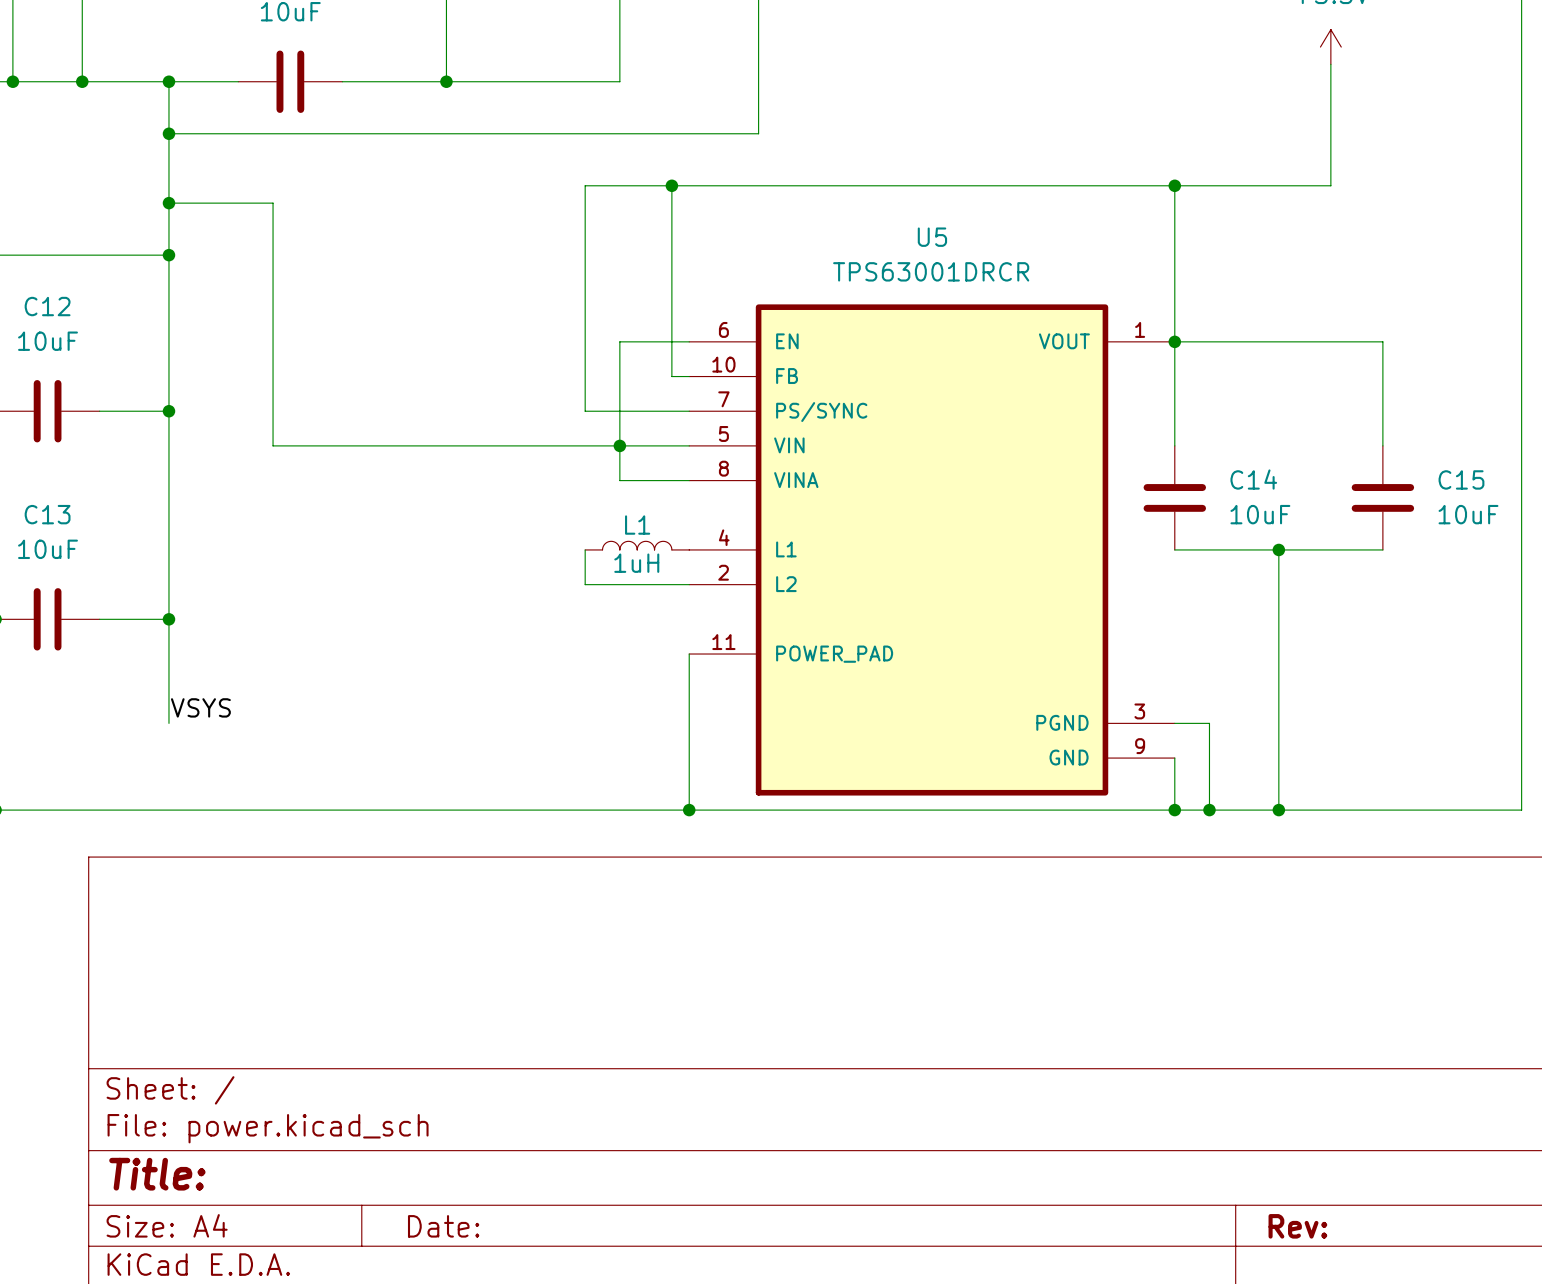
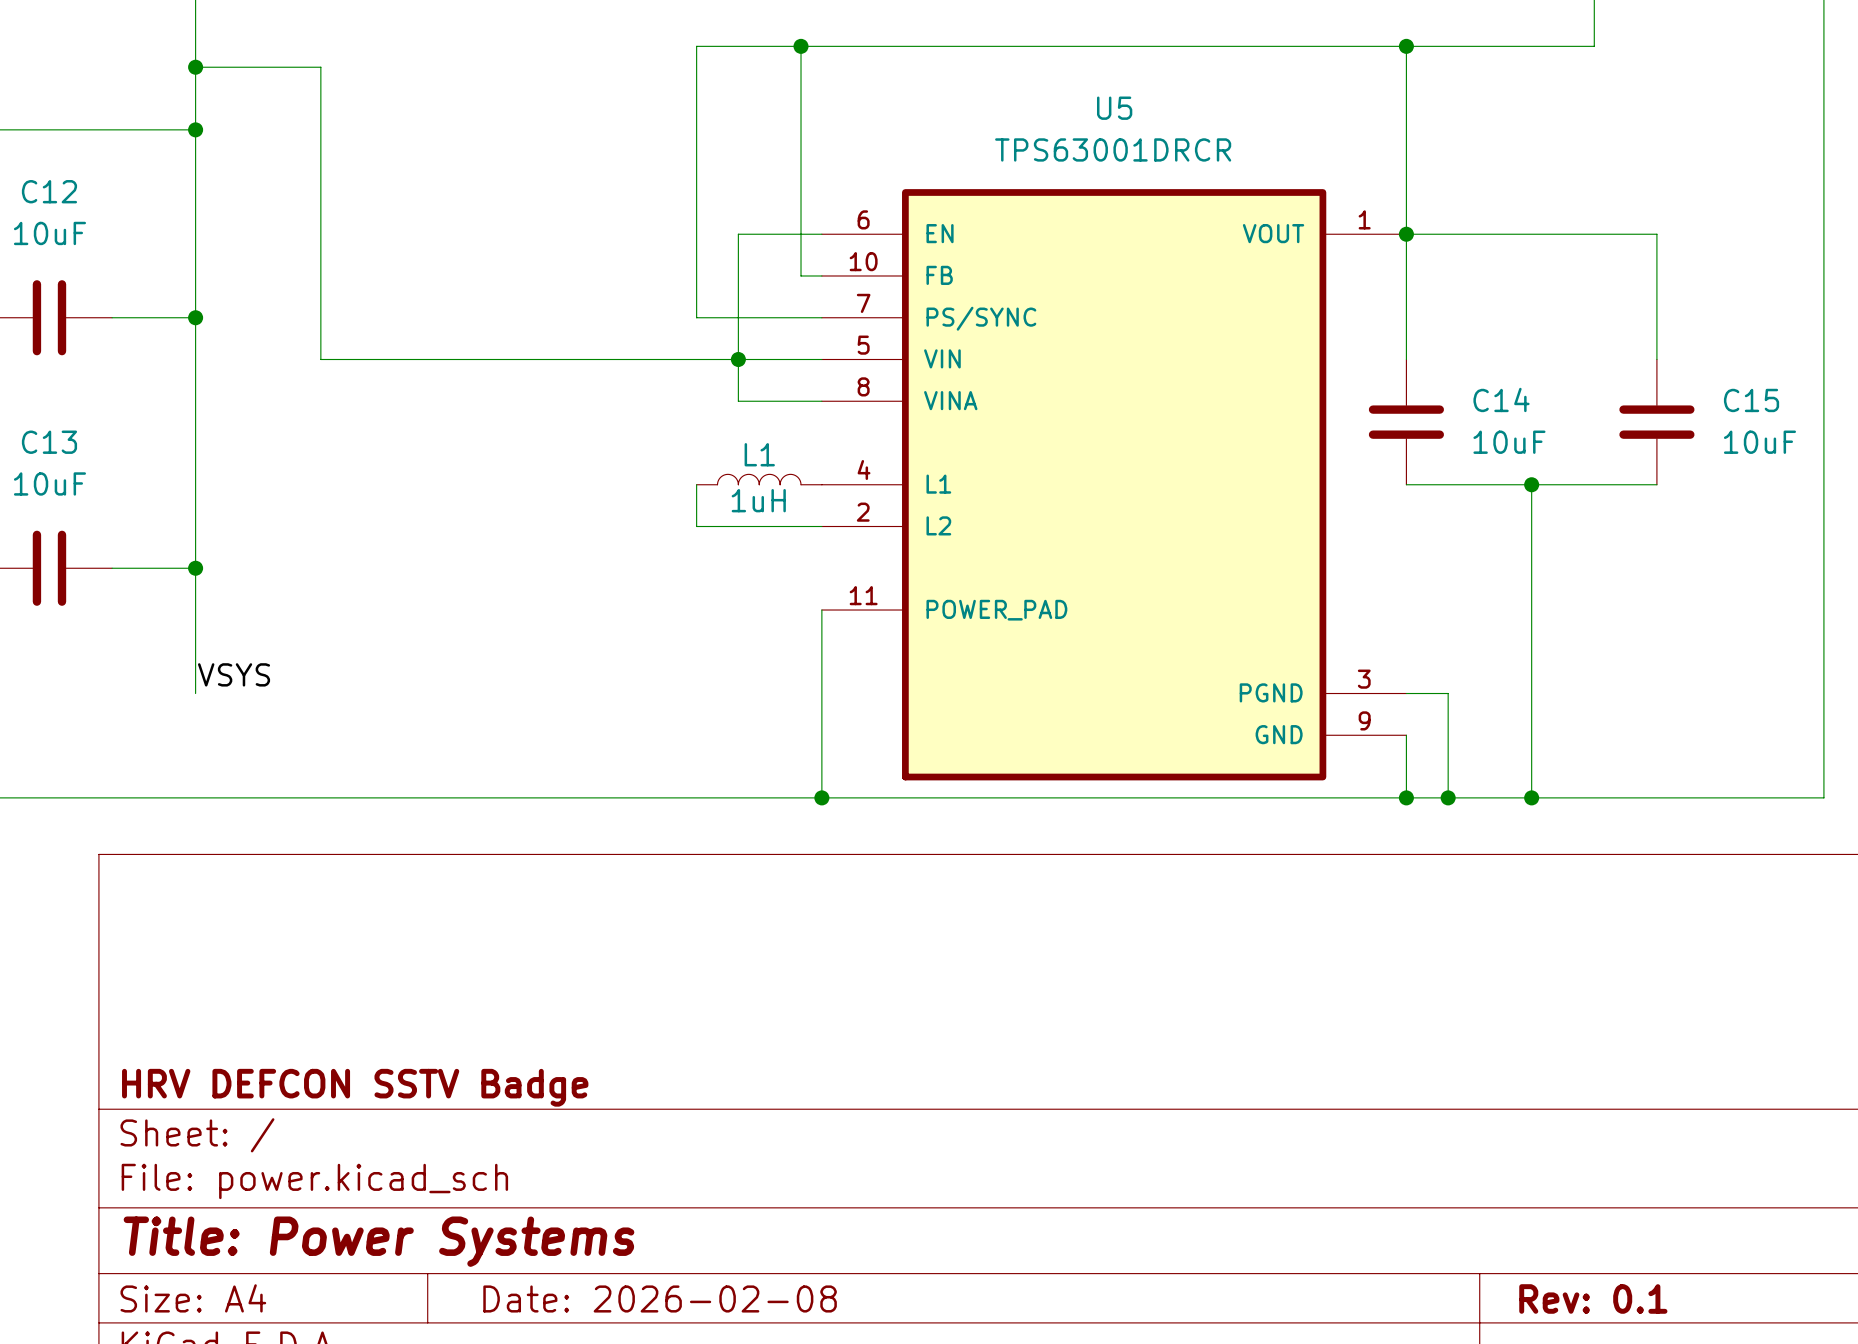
title block: none -> HRV DEFCON SSTV Badge (355, 1087)
title block: Title: (157, 1174) -> Title: Power Systems (379, 1241)
title block: Date: (443, 1226) -> Date: 2026-02-08 (660, 1298)
title block: Rev: (1297, 1226) -> Rev: 0.1 (1593, 1298)

